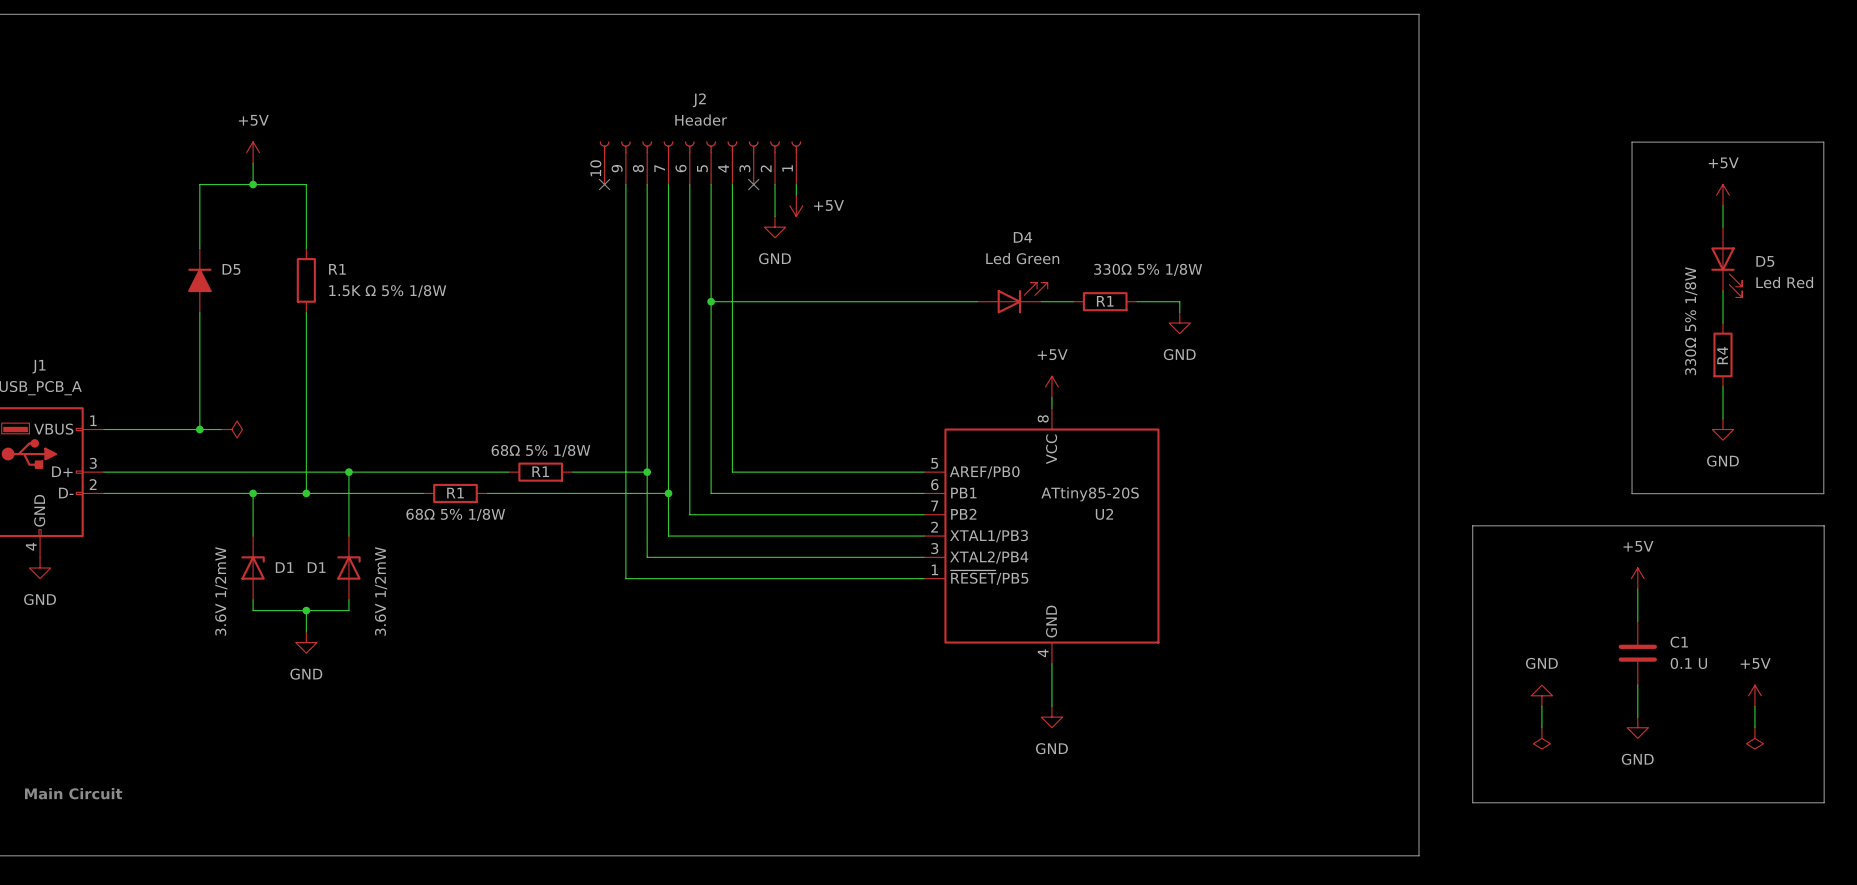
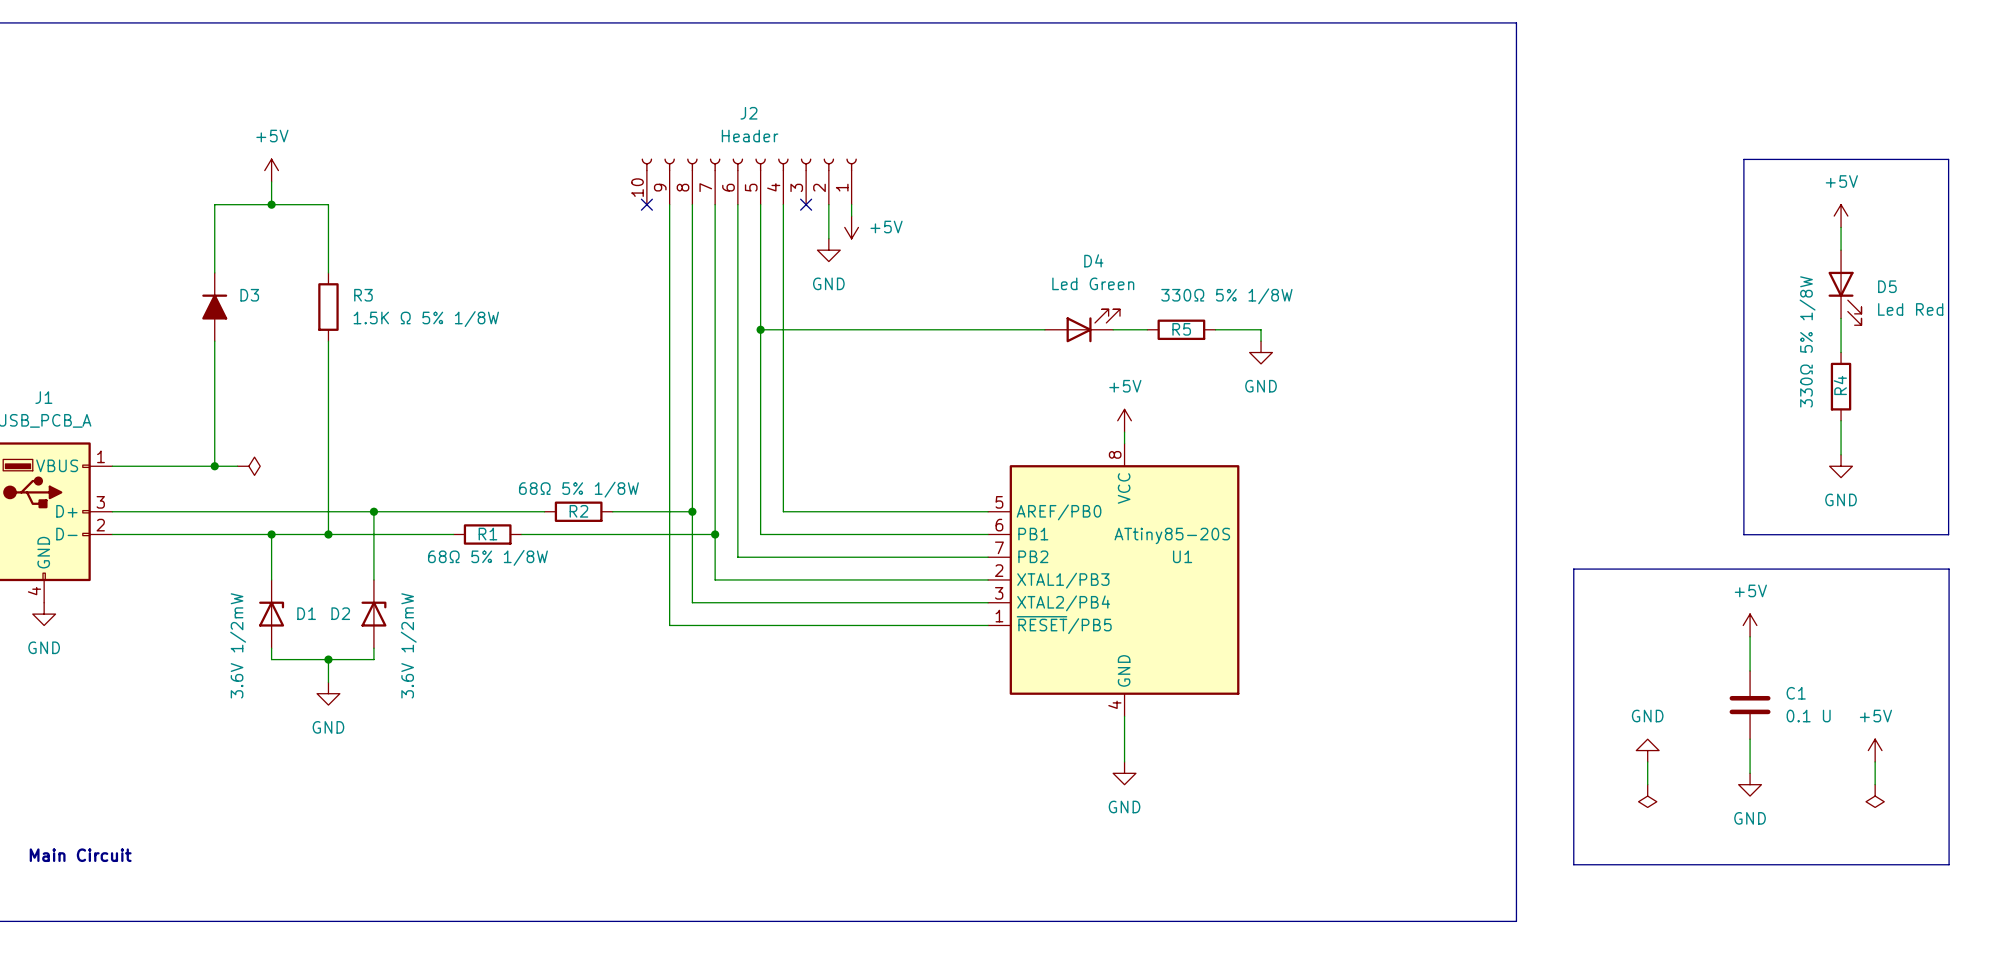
D5 name: D5 (231, 269) -> D3 (249, 295)
R1 name: R1 (337, 269) -> R3 (363, 295)
R1 name: R1 (1105, 301) -> R5 (1181, 329)
R1 name: R1 (540, 471) -> R2 (578, 511)
U2 name: U2 (1104, 514) -> U1 (1182, 556)
D1 name: D1 (316, 567) -> D2 (340, 613)

